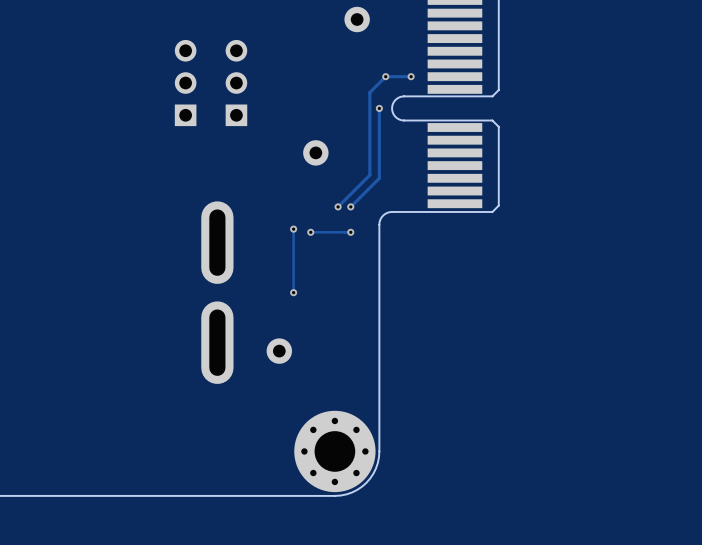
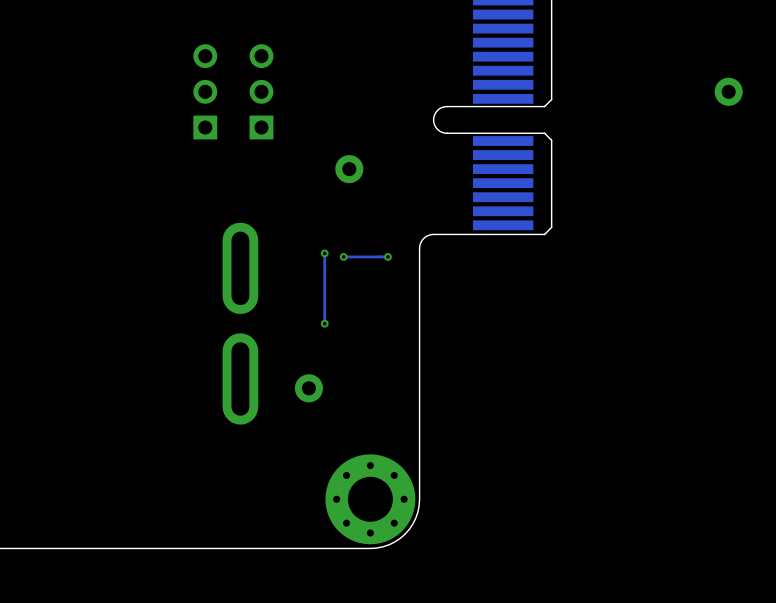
part position: (357, 19) -> (728, 91)
via: (385, 76) -> none
track: (411, 76) (385, 76) (369, 92) (369, 175) (338, 206) -> none
via: (411, 76) -> none
track: (379, 108) (379, 178) (350, 206) -> none
via: (379, 108) -> none
via: (338, 206) -> none
via: (350, 206) -> none

